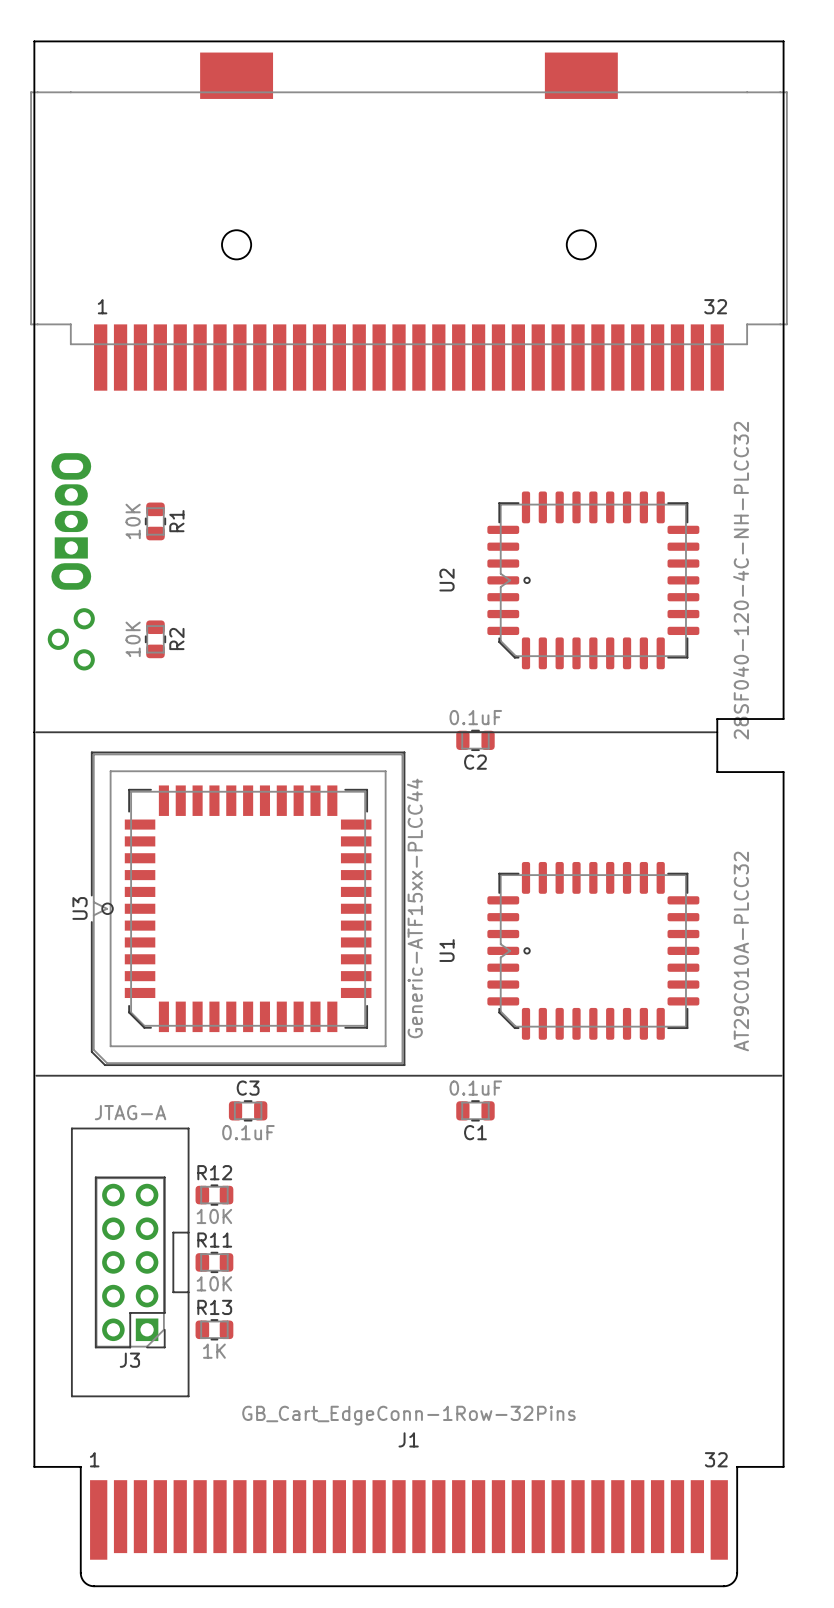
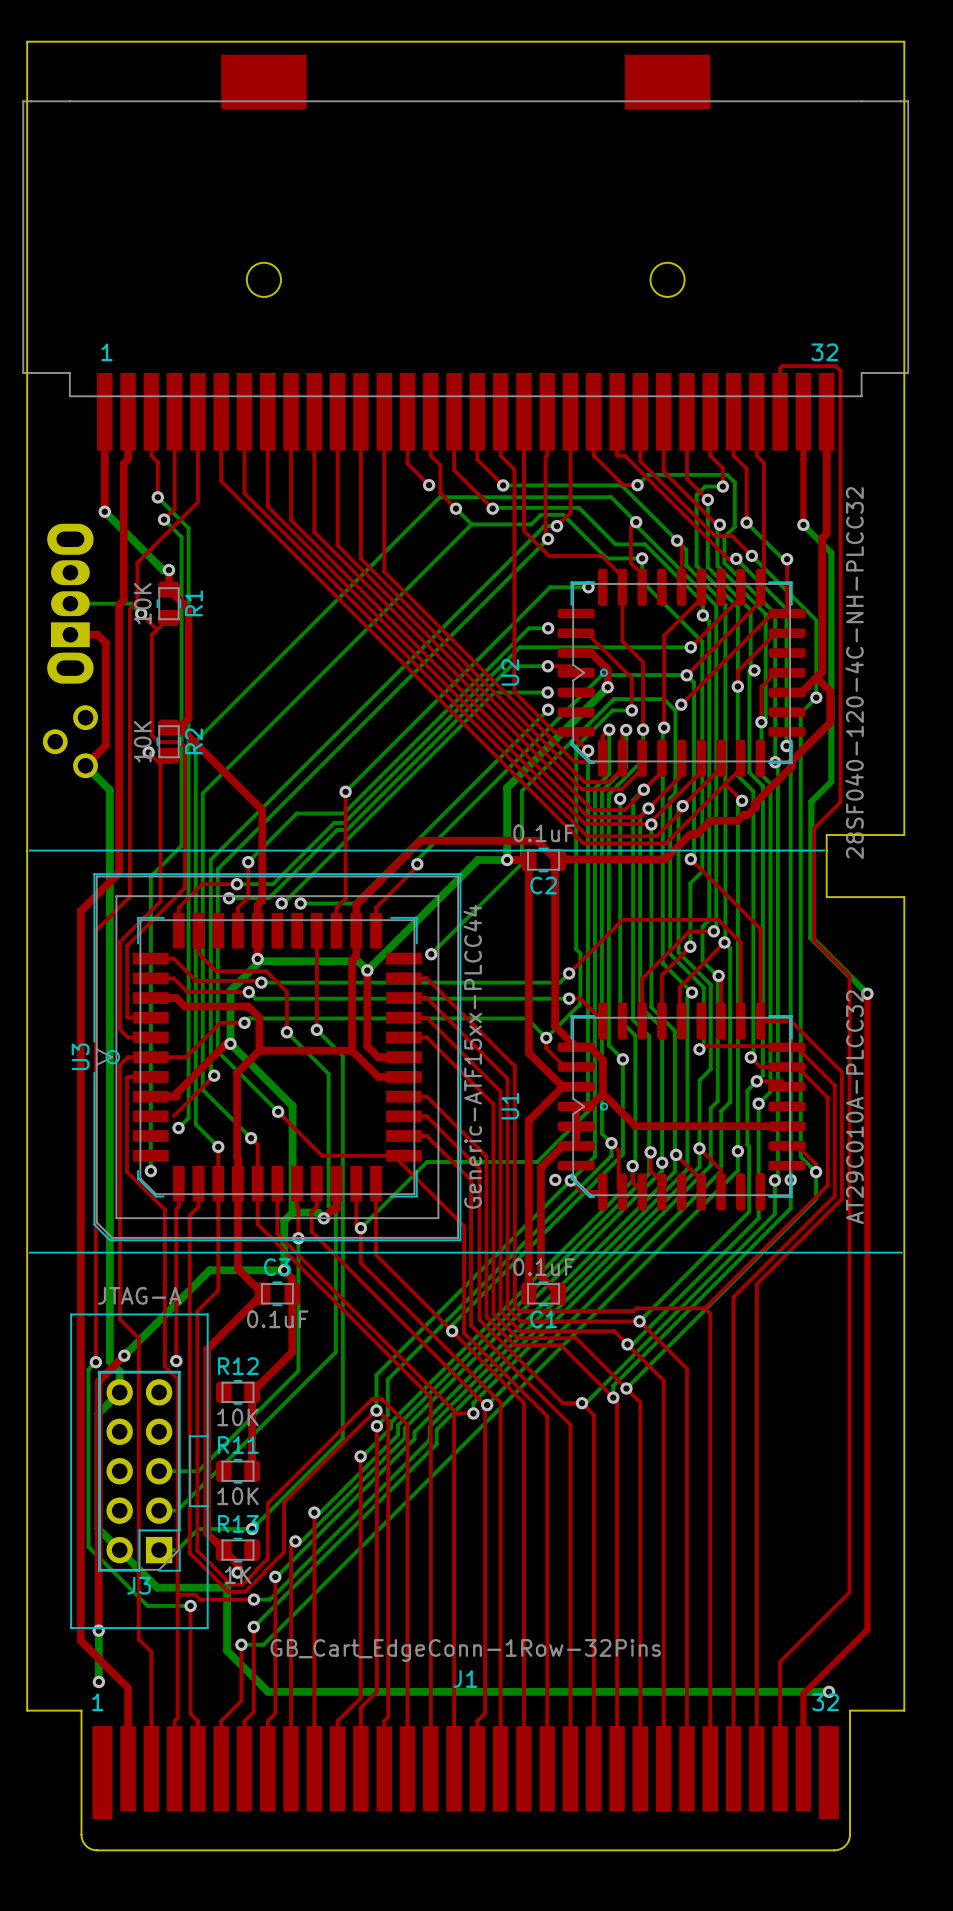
top track: none -> (104, 411) (104, 511)
top track: none -> (128, 411) (128, 459) (123, 463) (123, 600) (119, 604) (119, 872) (80, 911) (80, 1640) (128, 1687) (128, 1768)
top track: none -> (151, 411) (151, 455) (157, 462) (157, 497)
top track: none -> (174, 411) (174, 509) (164, 519)
top track: none -> (197, 411) (197, 502) (137, 562) (137, 601) (129, 609) (129, 896) (95, 930) (95, 1362)
top track: none -> (221, 411) (221, 481) (583, 843) (665, 843) (740, 768) (740, 758)
top track: none -> (244, 411) (244, 493) (587, 836) (656, 836) (682, 810) (682, 806) (721, 767) (721, 758)
top track: none -> (267, 411) (267, 506) (585, 824) (648, 824) (671, 801)
top track: none -> (291, 411) (291, 520) (588, 817) (639, 817) (681, 775) (681, 758)
top track: none -> (314, 411) (314, 532) (592, 810) (624, 810) (661, 771) (661, 758)
top track: none -> (337, 411) (337, 545) (581, 789) (621, 789) (642, 768) (642, 758)
top track: none -> (360, 411) (360, 558) (584, 782) (608, 782) (622, 768) (622, 733) (626, 729)
top track: none -> (384, 411) (384, 571) (574, 762) (598, 762) (602, 758) (602, 736) (609, 729)
top track: none -> (407, 411) (407, 463) (429, 485)
top track: none -> (430, 411) (430, 455) (440, 465) (440, 493) (455, 508)
top track: none -> (454, 411) (454, 470) (492, 508)
top track: none -> (477, 411) (477, 459) (503, 485)
top track: none -> (500, 411) (500, 455) (514, 469) (514, 691) (554, 731) (576, 731) (576, 738) (588, 750)
top track: none -> (523, 411) (523, 530) (549, 556) (601, 556) (622, 576) (622, 641) (643, 662) (643, 729)
top track: none -> (547, 411) (545, 536) (547, 539)
top track: none -> (570, 411) (570, 512) (556, 526)
top track: none -> (593, 411) (593, 455) (623, 485) (637, 485)
top track: none -> (617, 411) (617, 455) (624, 455) (728, 558) (736, 558)
top track: none -> (640, 411) (640, 461) (715, 536) (731, 536) (751, 555)
top track: none -> (663, 411) (663, 471) (716, 524) (719, 524)
top track: none -> (686, 411) (686, 478) (707, 499)
top track: none -> (710, 411) (710, 455) (722, 468) (722, 486)
top track: none -> (733, 411) (733, 455) (746, 468) (746, 522)
top track: none -> (756, 411) (756, 455) (763, 462) (763, 583) (760, 587) (760, 601) (686, 675)
top track: none -> (780, 411) (780, 367) (781, 366) (835, 366) (840, 370) (840, 802) (814, 828) (814, 940) (849, 976) (849, 1592) (780, 1661) (780, 1768)
top track: none -> (803, 411) (803, 524)
top track: none -> (826, 411) (826, 533) (822, 538) (822, 671) (801, 692) (787, 692)
via: none -> (429, 485)
bottom track: none -> (503, 485) (621, 485) (686, 549) (686, 565) (725, 604) (724, 942) (730, 948) (730, 1102) (721, 1111) (721, 1170) (487, 1405)
via: none -> (503, 485)
bottom track: none -> (637, 485) (647, 474) (727, 474) (734, 482) (734, 526) (724, 537) (724, 562) (775, 613) (775, 762) (777, 764) (777, 1177) (774, 1180) (774, 1213) (585, 1403) (581, 1403)
via: none -> (637, 485)
bottom track: none -> (722, 486) (705, 486) (696, 495) (696, 565) (737, 607) (737, 775) (753, 791) (753, 1054) (750, 1057)
via: none -> (722, 486)
bottom track: none -> (157, 497) (188, 528) (188, 1118) (178, 1127)
via: none -> (157, 497)
bottom track: none -> (707, 499) (707, 567) (750, 610) (750, 670)
via: none -> (707, 499)
bottom track: none -> (455, 508) (471, 524)
via: none -> (455, 508)
bottom track: none -> (492, 508) (579, 507) (615, 544) (645, 544) (702, 602) (702, 615) (709, 621) (709, 919) (702, 926) (702, 961) (717, 976)
via: none -> (492, 508)
bottom track: none -> (104, 511) (163, 570) (168, 570)
via: none -> (104, 511)
bottom track: none -> (164, 519) (181, 537) (181, 845) (150, 876) (150, 1171)
via: none -> (164, 519)
top track: none -> (636, 522) (630, 527) (630, 563) (642, 574) (642, 587)
via: none -> (636, 522)
bottom track: none -> (746, 522) (783, 559) (787, 559)
via: none -> (746, 522)
bottom track: none -> (471, 524) (531, 524) (540, 514) (563, 514) (606, 558) (642, 558) (642, 581) (702, 641) (702, 871) (690, 883) (690, 946)
bottom track: none -> (471, 524) (202, 793) (202, 1089) (251, 1138)
bottom track: none -> (719, 524) (717, 527) (717, 565) (765, 614) (765, 717) (761, 722) (761, 774) (770, 783) (770, 1091) (758, 1103) (758, 1218) (632, 1344) (627, 1344)
via: none -> (719, 524)
bottom track: none -> (803, 524) (831, 552) (831, 781) (811, 801) (811, 937) (867, 993)
via: none -> (803, 524)
bottom track: none -> (556, 526) (544, 526) (210, 859) (210, 1072) (214, 1075)
via: none -> (556, 526)
bottom track: none -> (547, 539) (217, 869) (217, 1051) (278, 1111)
via: none -> (547, 539)
top track: none -> (677, 540) (681, 545) (681, 587)
via: none -> (677, 540)
bottom track: none -> (751, 555) (816, 620) (816, 697) (800, 713) (800, 1156) (816, 1172) (816, 1198) (626, 1388)
via: none -> (751, 555)
via: none -> (642, 558)
bottom track: none -> (736, 558) (786, 609) (786, 746) (790, 750) (790, 1208) (613, 1385) (613, 1397)
via: none -> (736, 558)
top track: none -> (787, 559) (787, 613) (772, 613) (681, 704)
via: none -> (787, 559)
top track: none -> (168, 570) (168, 589) (188, 609) (188, 718) (179, 727)
via: none -> (168, 570)
bottom track: none -> (588, 587) (550, 587) (345, 791)
via: none -> (588, 587)
top track: none -> (701, 587) (701, 598) (664, 635) (664, 727)
top track: none -> (740, 587) (740, 597) (690, 647)
bottom track: none -> (70, 603) (131, 603) (141, 613)
top track: none -> (141, 613) (157, 629)
via: none -> (141, 613)
via: none -> (702, 615)
top track: none -> (168, 617) (151, 634) (151, 735) (158, 742) (180, 742) (185, 746) (185, 887) (127, 945) (127, 1016) (150, 1017)
bottom track: none -> (548, 628) (528, 628) (343, 813) (296, 813) (248, 862)
via: none -> (548, 628)
top track: none -> (576, 633) (587, 633) (631, 678) (631, 710)
top track: none -> (787, 633) (775, 633) (737, 671) (737, 686)
top track: none -> (70, 634) (97, 634) (105, 642) (105, 745) (85, 765)
bottom track: none -> (690, 647) (519, 647) (344, 822) (334, 822) (273, 884) (236, 884)
via: none -> (690, 647)
top track: none -> (576, 652) (591, 652) (607, 669) (607, 687)
top track: none -> (547, 666) (569, 666) (576, 672)
bottom track: none -> (547, 666) (510, 666) (347, 829) (337, 829) (268, 898) (229, 898)
via: none -> (547, 666)
bottom track: none -> (750, 670) (749, 772) (762, 785) (762, 1075) (747, 1090) (749, 1211) (639, 1321)
via: none -> (754, 670)
top track: none -> (787, 672) (775, 672) (761, 687) (761, 722)
via: none -> (686, 675)
top track: none -> (816, 677) (830, 691) (830, 722) (791, 761) (791, 767) (756, 802) (756, 806) (747, 814) (743, 814) (737, 820) (710, 820) (696, 834) (692, 834)
bottom track: none -> (607, 687) (507, 787) (507, 860) (477, 860) (367, 970) (358, 961) (259, 961)
via: none -> (607, 687)
via: none -> (737, 686)
bottom track: none -> (547, 692) (494, 692) (281, 903)
via: none -> (547, 692)
via: none -> (816, 697)
via: none -> (681, 704)
bottom track: none -> (548, 709) (354, 903) (300, 903)
via: none -> (548, 709)
bottom track: none -> (631, 710) (612, 710) (576, 746) (576, 949) (580, 953) (580, 1003) (546, 1037) (526, 1018) (248, 1018) (244, 1022)
via: none -> (631, 710)
via: none -> (761, 722)
top track: none -> (179, 727) (262, 809) (262, 900) (257, 905) (257, 958)
bottom track: none -> (664, 727) (662, 963) (691, 992) (687, 997) (687, 1169) (429, 1426) (429, 1440) (270, 1599) (253, 1599)
via: none -> (664, 727)
bottom track: none -> (609, 729) (609, 774) (594, 788) (594, 1156) (376, 1374) (376, 1410)
via: none -> (609, 729)
bottom track: none -> (626, 729) (626, 767) (601, 791) (601, 1133) (611, 1143) (611, 1155) (387, 1379) (387, 1415) (376, 1426)
via: none -> (626, 729)
bottom track: none -> (643, 729) (643, 759) (608, 794) (608, 1045) (622, 1059) (622, 1154) (452, 1325) (452, 1331)
via: none -> (643, 729)
via: none -> (786, 746)
bottom track: none -> (587, 750) (587, 1111) (537, 1161) (427, 1161) (360, 1228)
via: none -> (588, 750)
top track: none -> (148, 752) (160, 764)
via: none -> (148, 752)
top track: none -> (701, 758) (701, 771) (671, 801)
via: none -> (775, 762)
top track: none -> (160, 764) (160, 901) (120, 941) (120, 1029) (127, 1037) (150, 1037)
bottom track: none -> (85, 765) (109, 790) (109, 1361) (119, 1371) (119, 1392) (98, 1413) (98, 1528) (157, 1587) (227, 1587) (227, 1650) (268, 1691) (829, 1691)
top track: none -> (725, 784) (742, 800)
bottom track: none -> (643, 789) (633, 800) (633, 1019) (649, 1036) (649, 1174) (398, 1425) (398, 1434) (320, 1512) (314, 1512)
via: none -> (643, 789)
top track: none -> (345, 791) (345, 898) (336, 907) (336, 930)
via: none -> (345, 791)
bottom track: none -> (620, 798) (620, 1020) (635, 1035) (635, 1163) (632, 1166) (632, 1180) (391, 1422) (391, 1427) (360, 1456)
via: none -> (620, 798)
bottom track: none -> (742, 800) (737, 804) (737, 1170) (263, 1644) (241, 1644)
via: none -> (742, 800)
bottom track: none -> (682, 806) (678, 810) (678, 952) (710, 984) (710, 1069) (699, 1080) (699, 1166) (436, 1429) (436, 1444) (253, 1626)
via: none -> (682, 806)
bottom track: none -> (648, 808) (640, 816) (640, 1006) (662, 1028) (662, 1170) (405, 1427) (405, 1437) (301, 1541) (295, 1541)
via: none -> (648, 808)
bottom track: none -> (651, 824) (651, 1007) (674, 1031) (674, 1171) (414, 1432) (414, 1438) (275, 1576)
via: none -> (651, 824)
top track: none -> (692, 834) (668, 856)
top track: none -> (668, 856) (665, 859) (565, 859) (558, 860) (555, 863) (555, 1026) (576, 1047) (590, 1047) (602, 1060) (602, 1093)
top track: none -> (690, 859) (760, 928) (760, 1021) (790, 1021) (841, 1071) (841, 1199) (756, 1284) (756, 1768)
bottom track: none -> (690, 859) (694, 855) (694, 682) (686, 675) (602, 675) (417, 859) (417, 864)
via: none -> (690, 859)
top track: none -> (507, 860) (528, 860) (528, 1052) (562, 1086)
via: none -> (507, 860)
top track: none -> (557, 860) (537, 840) (420, 840) (356, 905) (356, 956) (352, 960) (352, 1050)
top track: none -> (248, 862) (248, 897) (237, 907) (237, 930)
via: none -> (248, 862)
top track: none -> (417, 864) (417, 866) (376, 907) (376, 930)
via: none -> (417, 864)
top track: none -> (236, 884) (202, 884) (178, 907) (178, 930)
via: none -> (236, 884)
via: none -> (229, 898)
via: none -> (281, 903)
via: none -> (300, 903)
top track: none -> (198, 930) (198, 953) (216, 971) (266, 971) (286, 991) (286, 1032)
top track: none -> (316, 930) (316, 1029)
top track: none -> (713, 931) (689, 931) (642, 978) (642, 1021)
bottom track: none -> (713, 931) (716, 928) (716, 605) (636, 525) (636, 522) (611, 497) (439, 497) (195, 741) (195, 1124) (218, 1146)
via: none -> (713, 931)
top track: none -> (724, 942) (679, 987) (679, 1019) (681, 1021)
via: none -> (724, 942)
top track: none -> (690, 946) (661, 975) (661, 1021)
via: none -> (690, 946)
bottom track: none -> (431, 954) (521, 863) (521, 791) (613, 699) (663, 699) (675, 710) (675, 793) (670, 798) (670, 954) (703, 987) (703, 1045) (699, 1049)
via: none -> (431, 954)
top track: none -> (150, 958) (173, 958) (196, 980) (259, 980) (261, 982)
via: none -> (257, 958)
bottom track: none -> (259, 961) (230, 990) (230, 1043) (292, 1106) (292, 1212)
top track: none -> (367, 970) (367, 1046) (378, 1057) (403, 1057)
via: none -> (367, 970)
top track: none -> (569, 973) (622, 919) (718, 919) (740, 942) (740, 1021)
bottom track: none -> (569, 973) (560, 982) (261, 982)
via: none -> (569, 973)
bottom track: none -> (717, 976) (717, 1101) (710, 1108) (710, 1165) (473, 1402) (473, 1413)
top track: none -> (718, 975) (721, 978) (721, 1021)
via: none -> (718, 975)
top track: none -> (150, 978) (173, 978) (187, 992) (248, 992)
top track: none -> (403, 978) (426, 978) (514, 1066) (514, 1305) (520, 1311) (633, 1311) (636, 1308) (704, 1308)
via: none -> (261, 982)
bottom track: none -> (248, 992) (255, 998) (569, 998)
via: none -> (248, 992)
via: none -> (691, 992)
top track: none -> (867, 993) (867, 1629) (803, 1693) (803, 1768)
via: none -> (867, 993)
top track: none -> (150, 998) (176, 998) (185, 1006) (248, 1006) (259, 1017) (259, 1050)
top track: none -> (403, 998) (426, 998) (507, 1078) (507, 1308) (520, 1321) (639, 1321) (686, 1368) (686, 1768)
top track: none -> (569, 998) (580, 998) (602, 1021)
via: none -> (569, 998)
top track: none -> (403, 1017) (426, 1017) (500, 1091) (500, 1311) (520, 1331) (614, 1331) (663, 1380) (663, 1768)
top track: none -> (244, 1022) (220, 1022) (186, 1057) (127, 1057) (119, 1065) (119, 1319) (138, 1338) (138, 1639) (151, 1651) (151, 1768)
via: none -> (244, 1022)
bottom track: none -> (316, 1029) (342, 1055) (342, 1438) (252, 1528) (198, 1528) (177, 1550) (159, 1550)
via: none -> (316, 1029)
bottom track: none -> (286, 1032) (328, 1073) (328, 1206) (335, 1213) (335, 1352) (177, 1510) (159, 1510)
via: none -> (286, 1032)
top track: none -> (403, 1037) (426, 1037) (493, 1104) (493, 1313) (517, 1338) (576, 1338) (640, 1402) (640, 1768)
top track: none -> (546, 1037) (546, 1048) (564, 1067) (576, 1067)
via: none -> (546, 1037)
top track: none -> (230, 1043) (226, 1043) (176, 1093) (176, 1096) (150, 1096)
via: none -> (230, 1043)
top track: none -> (699, 1049) (702, 1046) (796, 1047) (834, 1085) (834, 1195) (733, 1297) (733, 1768)
via: none -> (699, 1049)
top track: none -> (259, 1050) (237, 1072) (237, 1269) (262, 1293) (207, 1349) (207, 1533) (237, 1563) (237, 1572)
top track: none -> (259, 1050) (352, 1050)
top track: none -> (352, 1050) (378, 1076) (403, 1076)
top track: none -> (750, 1057) (760, 1067) (797, 1067) (827, 1097) (827, 1185) (704, 1308)
via: none -> (750, 1057)
via: none -> (622, 1059)
top track: none -> (214, 1075) (173, 1116)
via: none -> (214, 1075)
top track: none -> (150, 1076) (126, 1077) (126, 1171) (164, 1209) (164, 1366) (177, 1379) (177, 1718) (174, 1721) (174, 1768)
top track: none -> (756, 1081) (781, 1081) (787, 1086)
via: none -> (756, 1081)
top track: none -> (562, 1086) (528, 1120) (528, 1293)
top track: none -> (602, 1093) (590, 1106) (576, 1106) (576, 1145) (562, 1145) (540, 1167) (540, 1276) (558, 1293)
top track: none -> (602, 1093) (635, 1126) (787, 1126)
top track: none -> (403, 1096) (426, 1096) (486, 1156) (486, 1316) (514, 1345) (560, 1345) (617, 1401) (617, 1768)
via: none -> (758, 1103)
top track: none -> (278, 1111) (322, 1155) (403, 1155)
via: none -> (278, 1111)
top track: none -> (403, 1116) (426, 1116) (479, 1169) (479, 1319) (562, 1403) (581, 1403) (593, 1414) (593, 1768)
via: none -> (178, 1127)
top track: none -> (403, 1136) (426, 1136) (471, 1180) (471, 1325) (570, 1424) (570, 1768)
top track: none -> (251, 1138) (257, 1144) (257, 1224) (430, 1397) (430, 1768)
via: none -> (251, 1138)
top track: none -> (611, 1143) (618, 1150) (618, 1188) (622, 1191)
via: none -> (611, 1143)
top track: none -> (787, 1145) (797, 1145) (816, 1164) (816, 1172)
top track: none -> (218, 1146) (218, 1290) (197, 1311) (197, 1550) (231, 1584) (242, 1584) (267, 1558) (267, 1503) (372, 1399) (381, 1399) (407, 1424) (407, 1768)
via: none -> (218, 1146)
top track: none -> (699, 1148) (721, 1170) (721, 1191)
via: none -> (699, 1148)
via: none -> (737, 1151)
top track: none -> (650, 1152) (650, 1170) (661, 1182) (661, 1191)
via: none -> (650, 1152)
top track: none -> (393, 1155) (464, 1226) (464, 1333) (547, 1416) (547, 1768)
top track: none -> (676, 1154) (701, 1180) (701, 1191)
via: none -> (676, 1154)
via: none -> (662, 1162)
top track: none -> (632, 1166) (632, 1182) (642, 1191)
via: none -> (632, 1166)
via: none -> (150, 1171)
via: none -> (816, 1172)
via: none -> (555, 1179)
via: none -> (790, 1180)
top track: none -> (570, 1180) (582, 1191) (602, 1191)
via: none -> (570, 1180)
via: none -> (774, 1180)
top track: none -> (178, 1183) (178, 1206) (176, 1209) (176, 1361)
top track: none -> (198, 1183) (198, 1206) (189, 1215) (189, 1553) (228, 1591) (245, 1591) (284, 1552) (284, 1502) (372, 1414) (381, 1414) (388, 1420) (388, 1717) (384, 1721) (384, 1768)
top track: none -> (277, 1183) (277, 1234) (454, 1410) (454, 1768)
top track: none -> (297, 1183) (298, 1238)
top track: none -> (316, 1183) (316, 1206) (311, 1211) (311, 1231) (485, 1405)
top track: none -> (336, 1183) (336, 1209) (332, 1209) (323, 1218)
top track: none -> (356, 1183) (356, 1223) (360, 1228) (360, 1262) (500, 1402) (500, 1768)
top track: none -> (376, 1183) (376, 1254) (523, 1402) (523, 1768)
bottom track: none -> (292, 1212) (284, 1220) (284, 1270) (209, 1270) (124, 1355)
bottom track: none -> (292, 1212) (318, 1212) (323, 1218)
via: none -> (323, 1218)
via: none -> (360, 1228)
bottom track: none -> (298, 1238) (298, 1371) (198, 1471) (159, 1471)
via: none -> (298, 1238)
top track: none -> (284, 1270) (292, 1278) (292, 1352) (252, 1392) (252, 1471)
via: none -> (284, 1270)
top track: none -> (704, 1308) (710, 1313) (710, 1768)
via: none -> (639, 1321)
via: none -> (452, 1331)
via: none -> (627, 1344)
top track: none -> (124, 1355) (98, 1381) (98, 1630)
via: none -> (124, 1355)
via: none -> (176, 1361)
bottom track: none -> (95, 1362) (88, 1369) (88, 1546) (147, 1605) (190, 1605)
via: none -> (95, 1362)
via: none -> (626, 1388)
via: none -> (613, 1397)
via: none -> (581, 1403)
top track: none -> (485, 1405) (485, 1713) (477, 1721) (477, 1768)
via: none -> (487, 1405)
via: none -> (376, 1410)
top track: none -> (454, 1413) (473, 1413)
via: none -> (473, 1413)
top track: none -> (376, 1426) (376, 1691) (360, 1707) (360, 1768)
via: none -> (376, 1426)
top track: none -> (360, 1456) (360, 1698) (337, 1721) (337, 1768)
via: none -> (360, 1456)
top track: none -> (314, 1512) (314, 1768)
via: none -> (314, 1512)
via: none -> (252, 1528)
top track: none -> (295, 1541) (291, 1545) (291, 1768)
via: none -> (295, 1541)
via: none -> (237, 1572)
top track: none -> (275, 1576) (275, 1713) (267, 1721) (267, 1768)
via: none -> (275, 1576)
top track: none -> (177, 1594) (195, 1594) (200, 1599) (253, 1599)
via: none -> (253, 1599)
top track: none -> (190, 1605) (190, 1713) (197, 1721) (197, 1768)
via: none -> (190, 1605)
top track: none -> (253, 1626) (253, 1711) (244, 1721) (244, 1768)
via: none -> (253, 1626)
bottom track: none -> (98, 1630) (98, 1681)
via: none -> (98, 1630)
top track: none -> (241, 1644) (241, 1700) (221, 1721) (221, 1768)
via: none -> (241, 1644)
via: none -> (98, 1681)
via: none -> (829, 1691)

